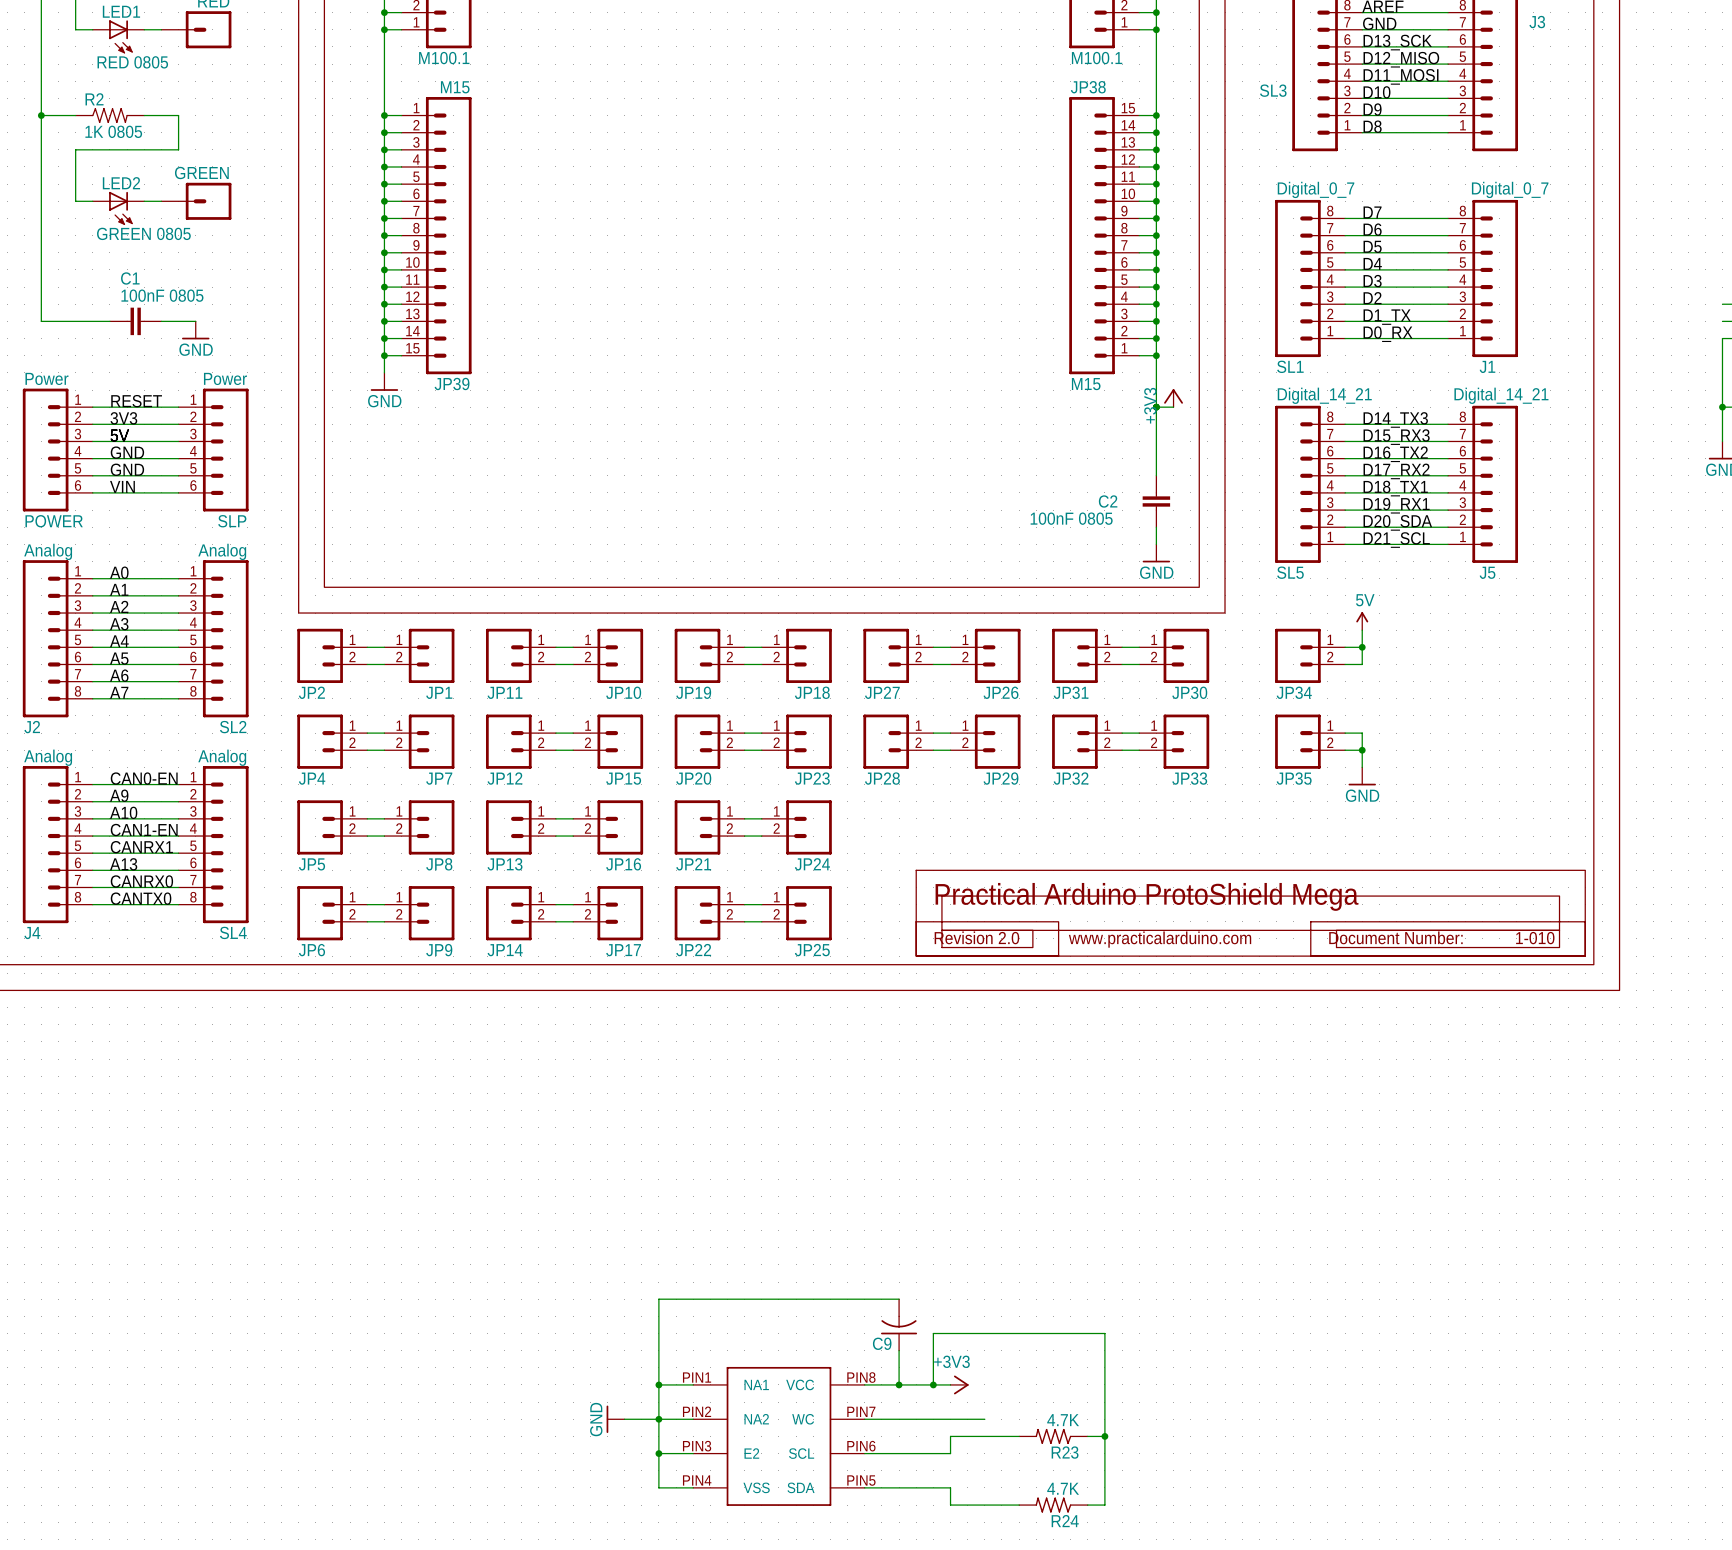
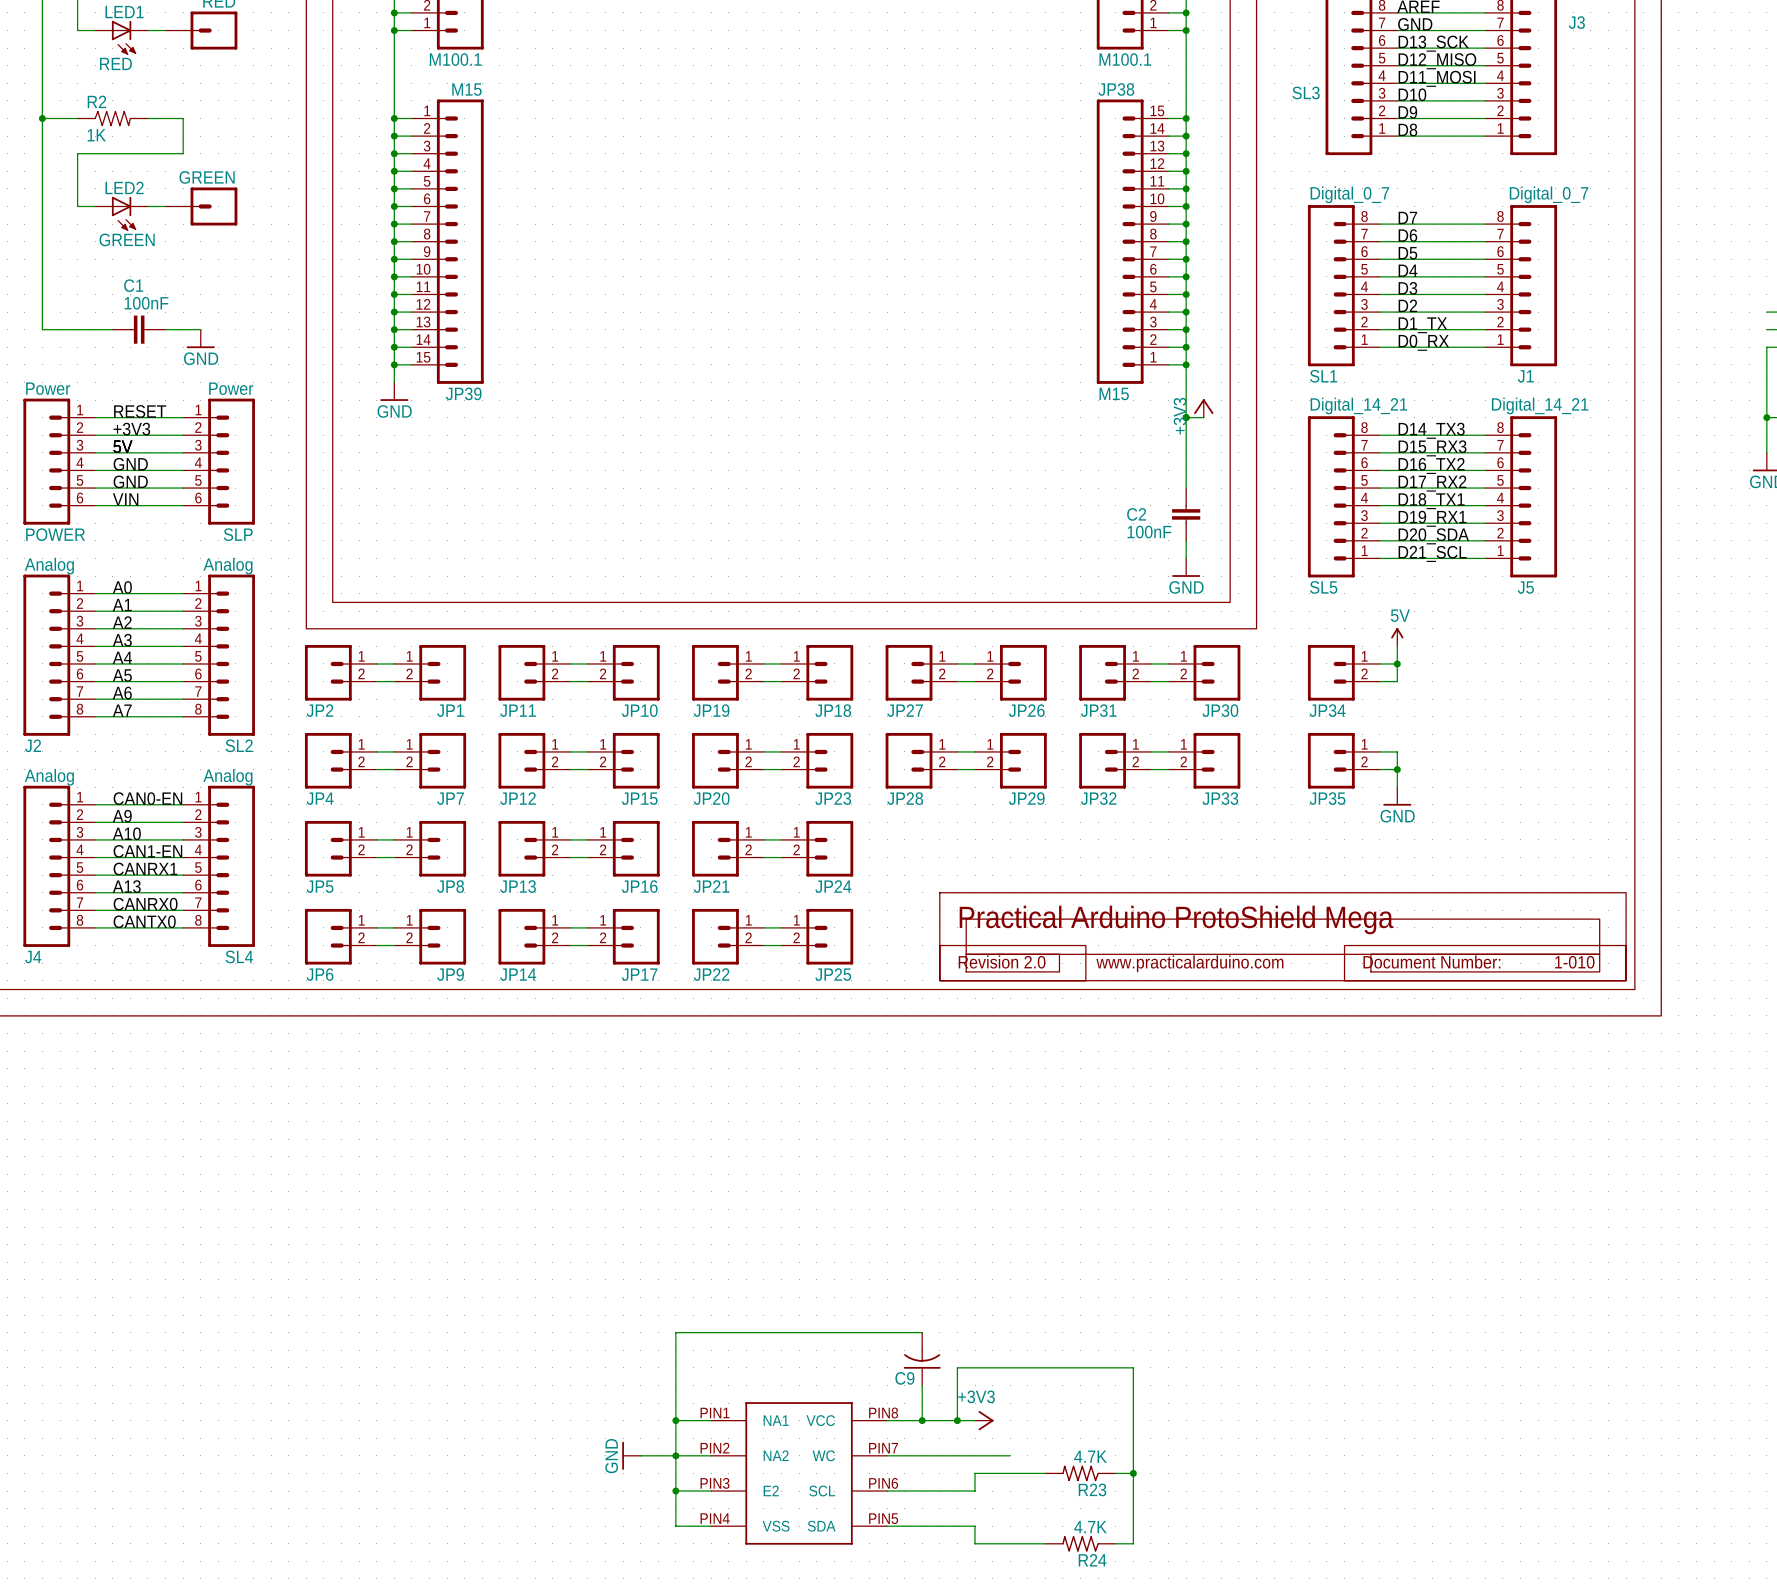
LED1 value: RED 0805 (132, 62) -> RED (116, 63)
R2 value: 1K 0805 (113, 131) -> 1K (96, 135)
LED2 value: GREEN 0805 (143, 233) -> GREEN (127, 239)
C1 value: 100nF 0805 (162, 295) -> 100nF (146, 303)
label: 3V3 (123, 418) -> +3V3 (131, 429)
C2 value: 100nF 0805 (1071, 518) -> 100nF (1149, 532)

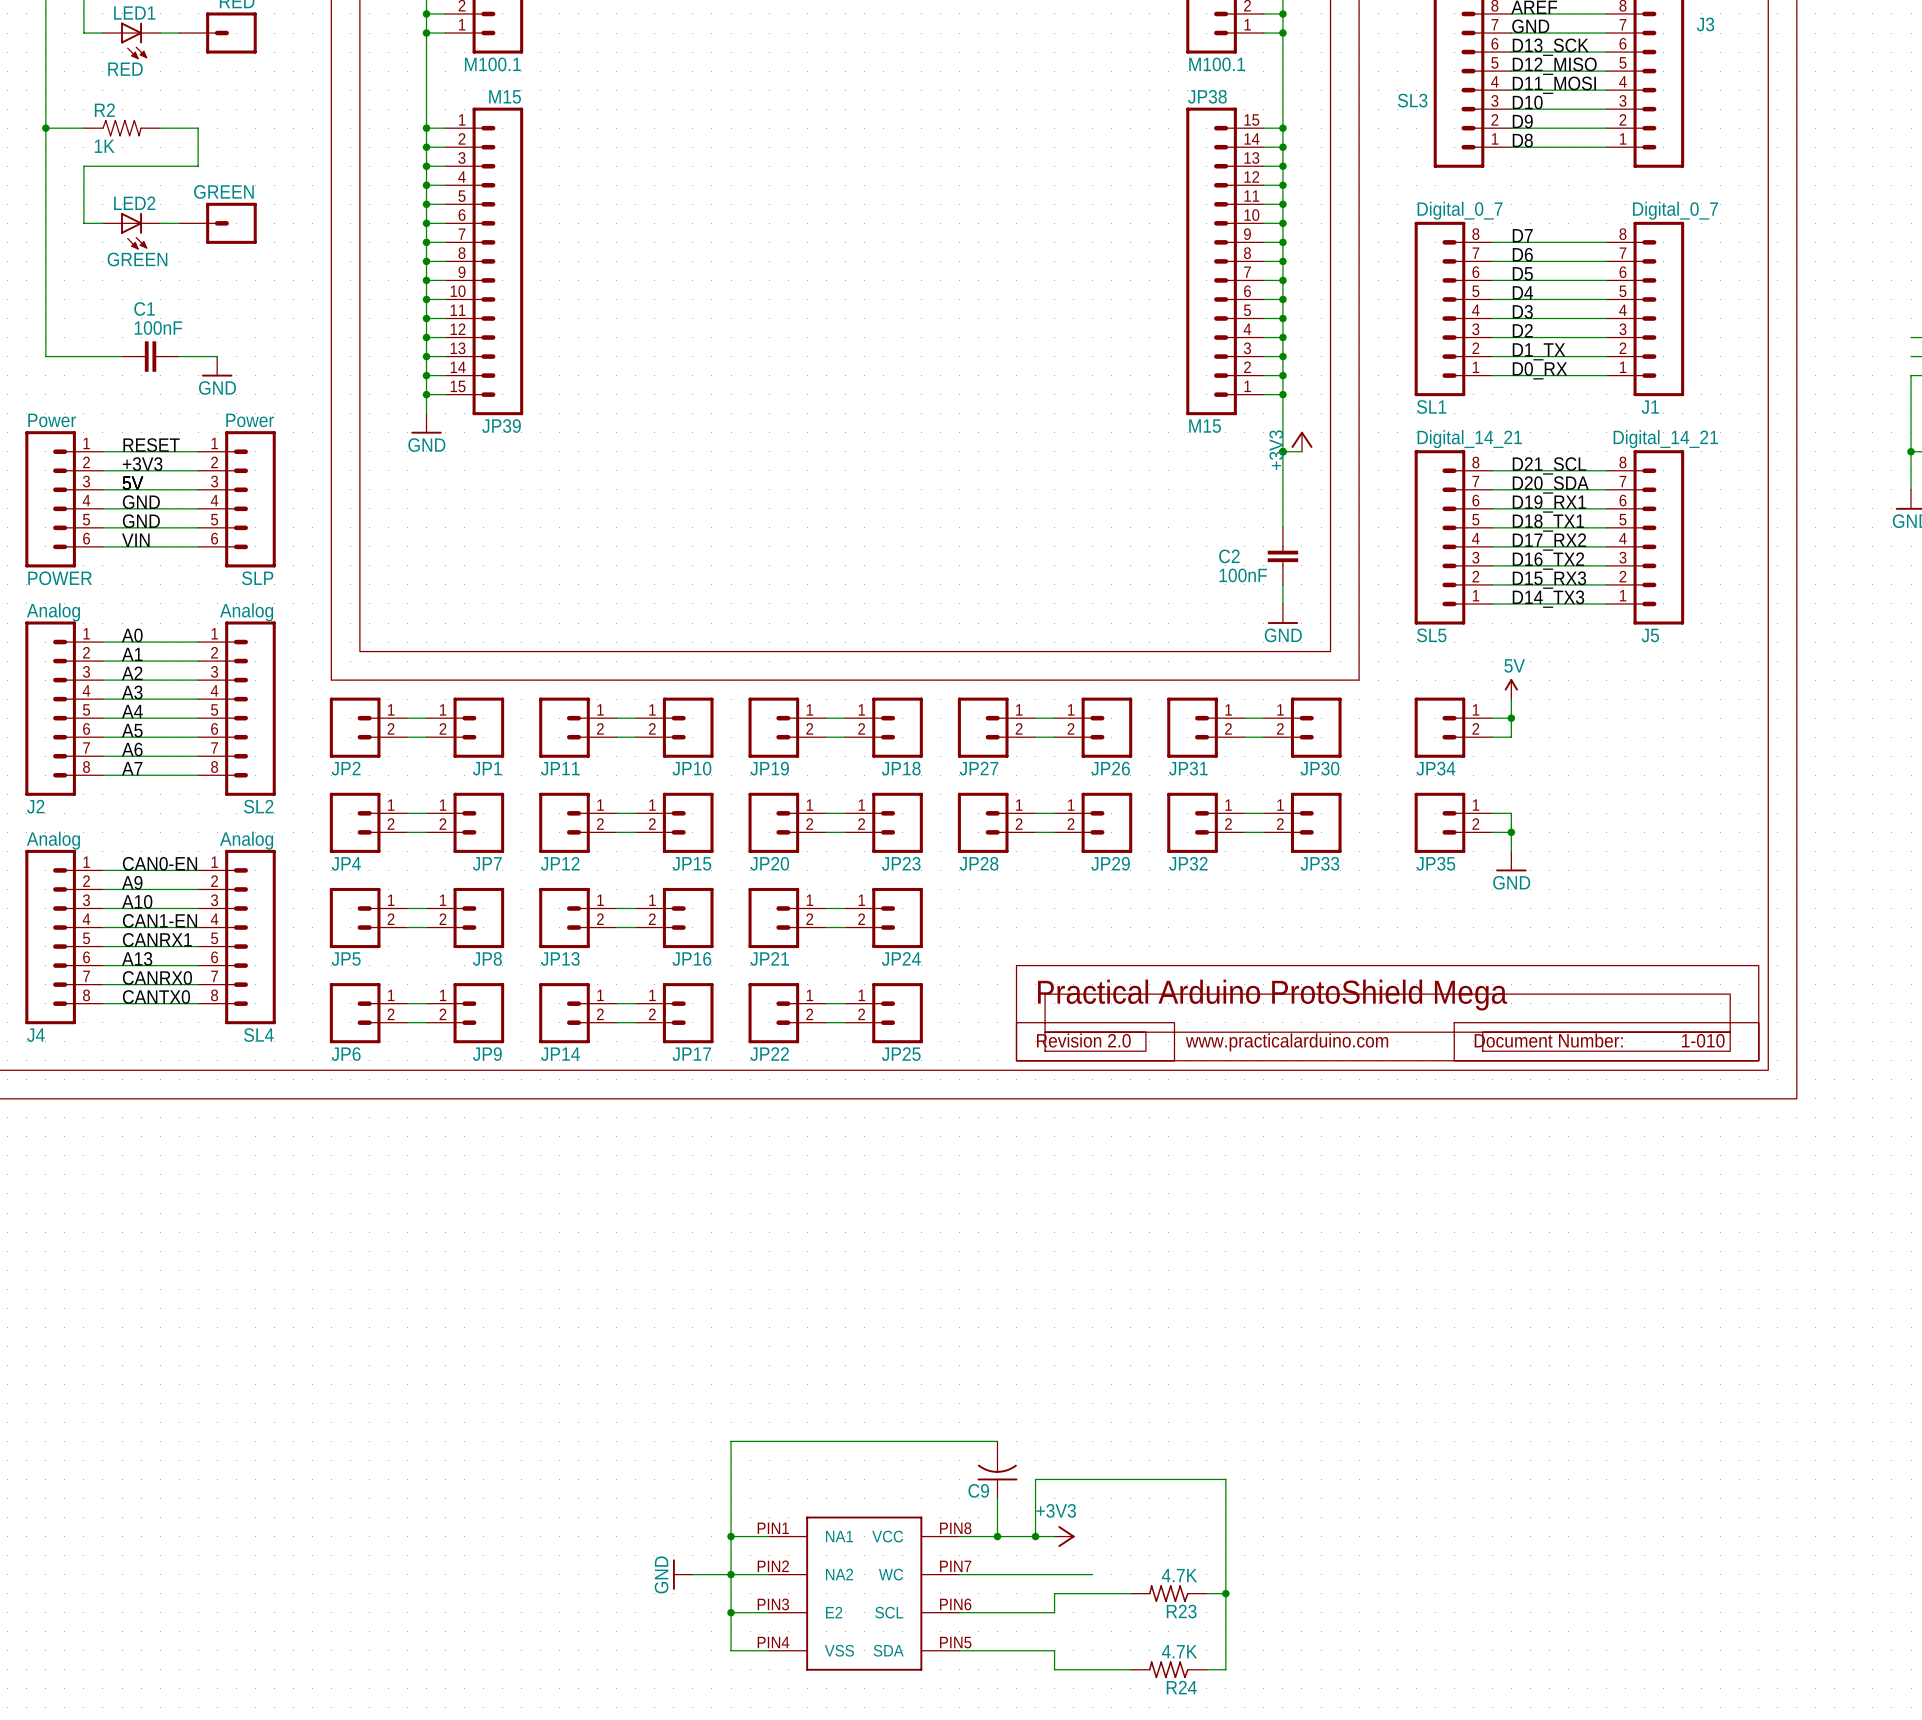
label: D14_TX3 (1431, 430) -> D21_SCL (1549, 465)
label: D15_RX3 (1432, 448) -> D20_SDA (1550, 484)
label: D16_TX2 (1431, 465) -> D19_RX1 (1549, 503)
label: D17_RX2 (1432, 483) -> D18_TX1 (1548, 523)
label: D18_TX1 (1431, 501) -> D17_RX2 (1549, 542)
label: D19_RX1 (1432, 518) -> D16_TX2 (1548, 561)
label: D20_SDA (1433, 536) -> D15_RX3 (1549, 580)
label: D21_SCL (1432, 553) -> D14_TX3 (1548, 599)

